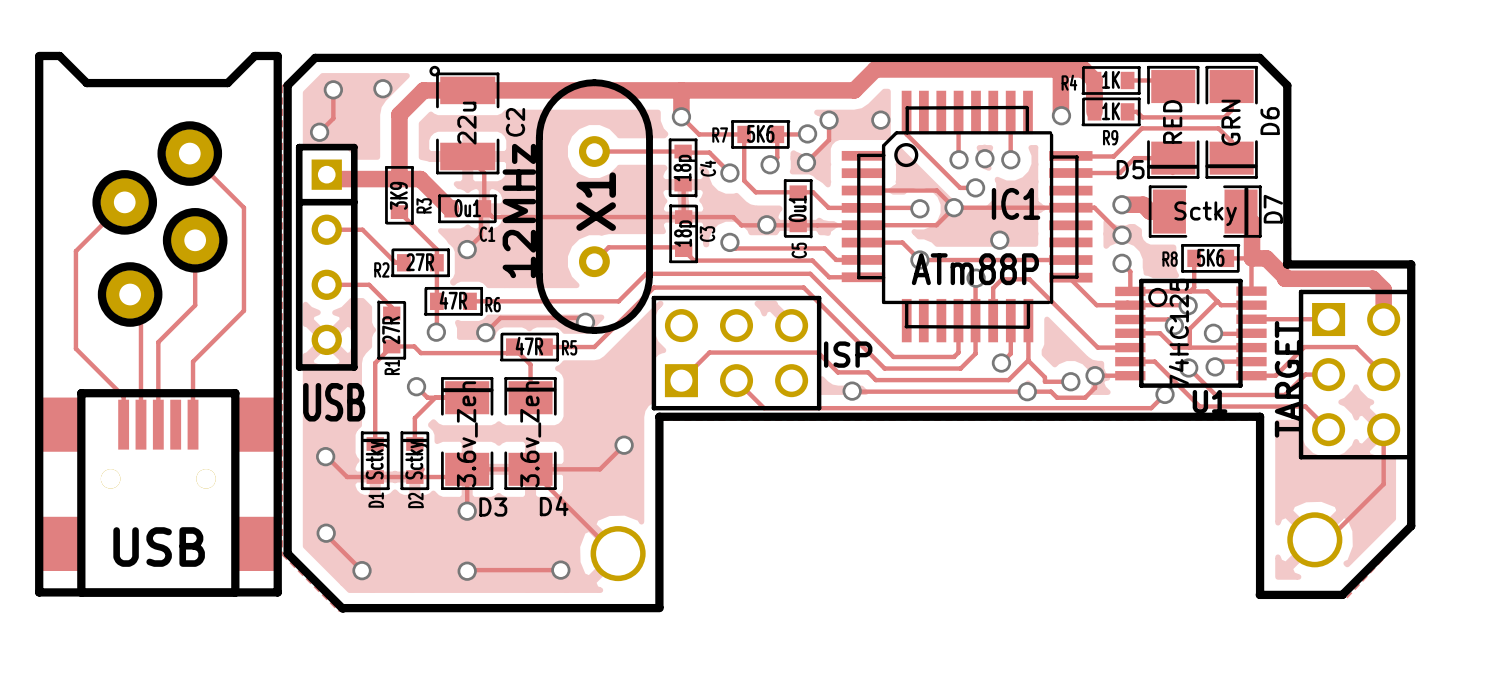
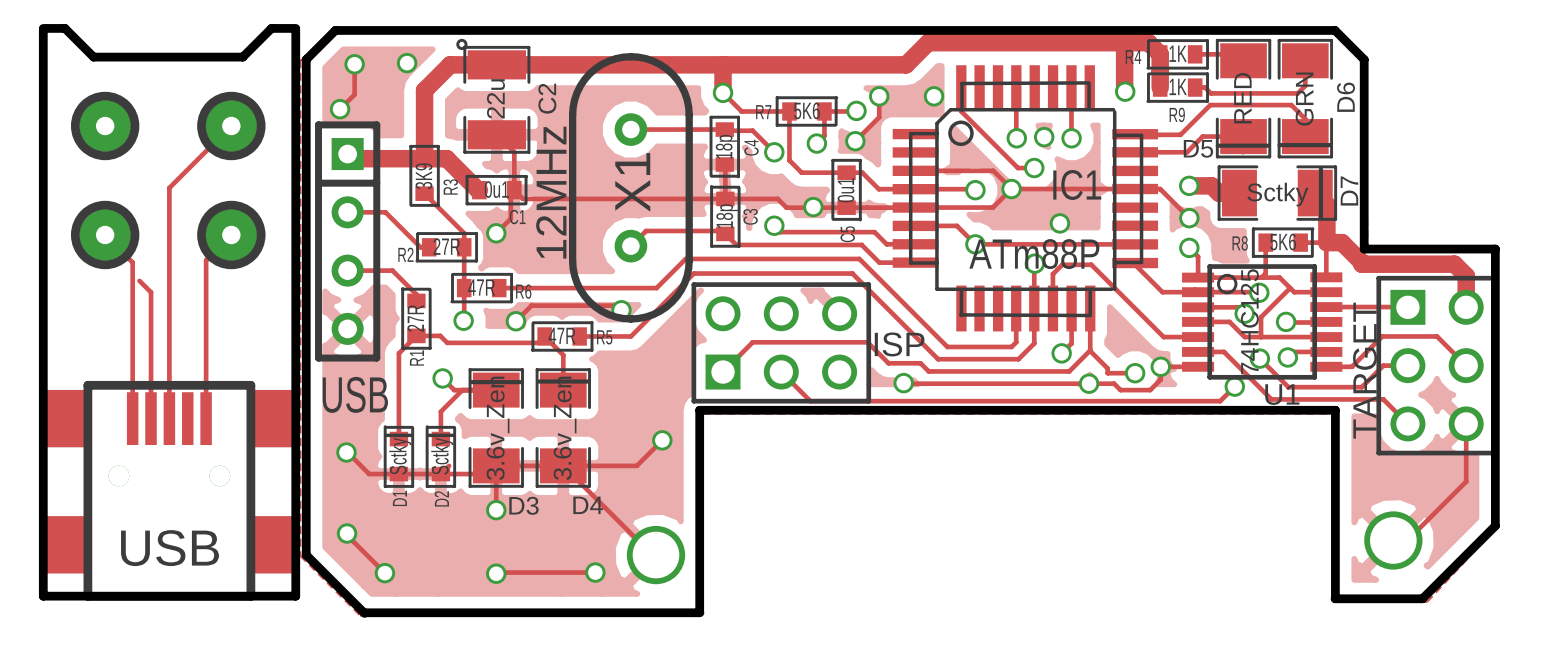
part: none -> (105, 126)
part: none -> (231, 126)
track: (189, 153) (243, 207) (243, 310) (193, 361) -> (231, 235) (206, 260) (206, 351)
part: (189, 153) -> none
track: (124, 202) (75, 251) (75, 348) (123, 396) -> (105, 235) (132, 262) (132, 388)
part: (124, 202) -> none
track: (195, 240) (195, 305) (158, 342) -> (231, 126) (169, 187) (169, 331)
part: (195, 240) -> none
part: none -> (105, 235)
part: none -> (231, 235)
part: (130, 294) -> none

